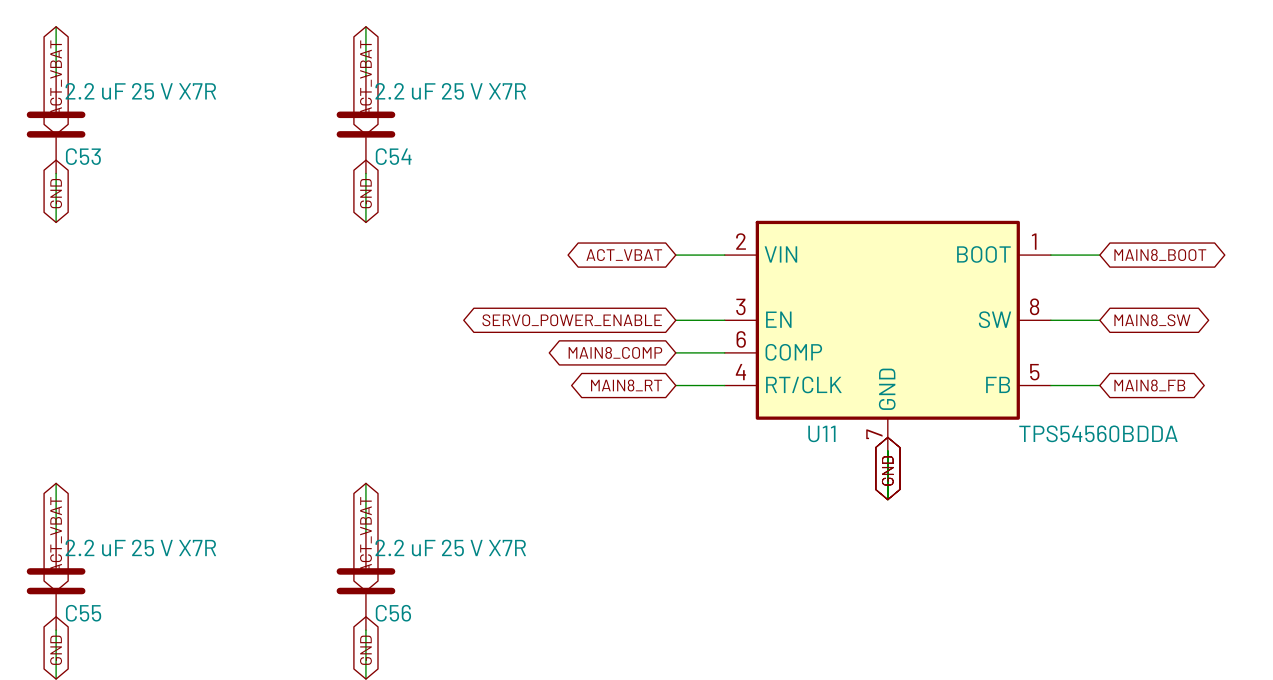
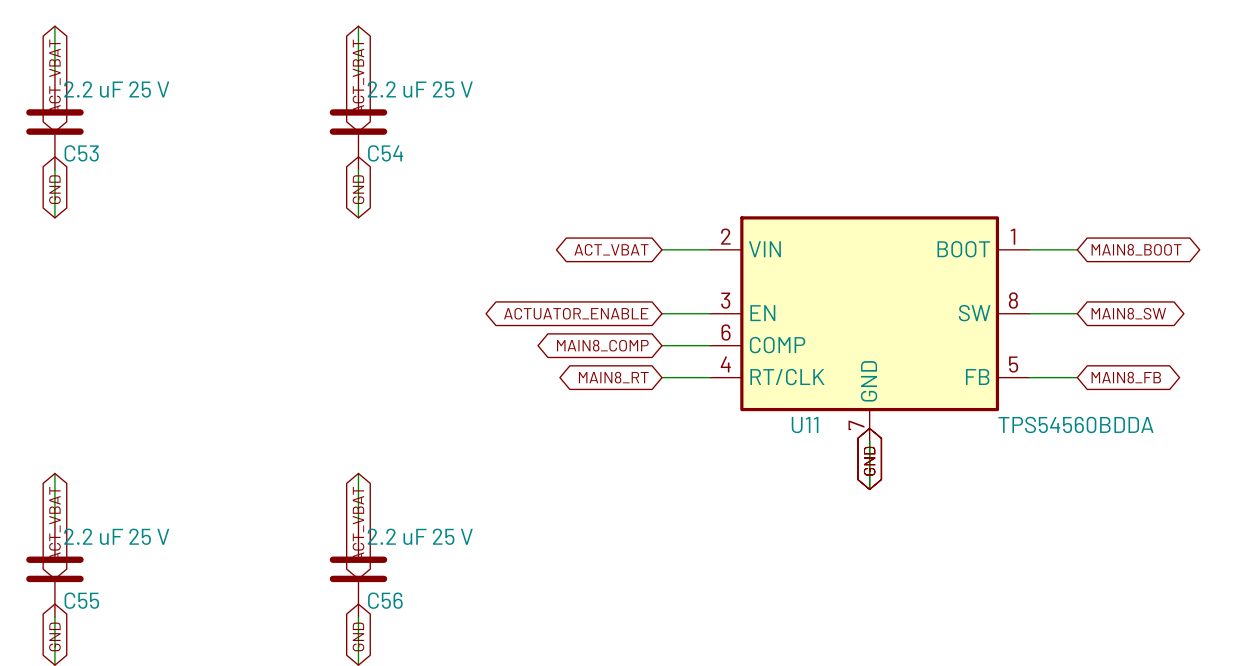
C53 value: 2.2 uF 25 V X7R (140, 91) -> 2.2 uF 25 V (116, 89)
C54 value: 2.2 uF 25 V X7R (450, 91) -> 2.2 uF 25 V (420, 89)
global label: SERVO_POWER_ENABLE (572, 320) -> ACTUATOR_ENABLE (576, 313)
C55 value: 2.2 uF 25 V X7R (140, 547) -> 2.2 uF 25 V (116, 536)
C56 value: 2.2 uF 25 V X7R (450, 547) -> 2.2 uF 25 V (420, 536)

